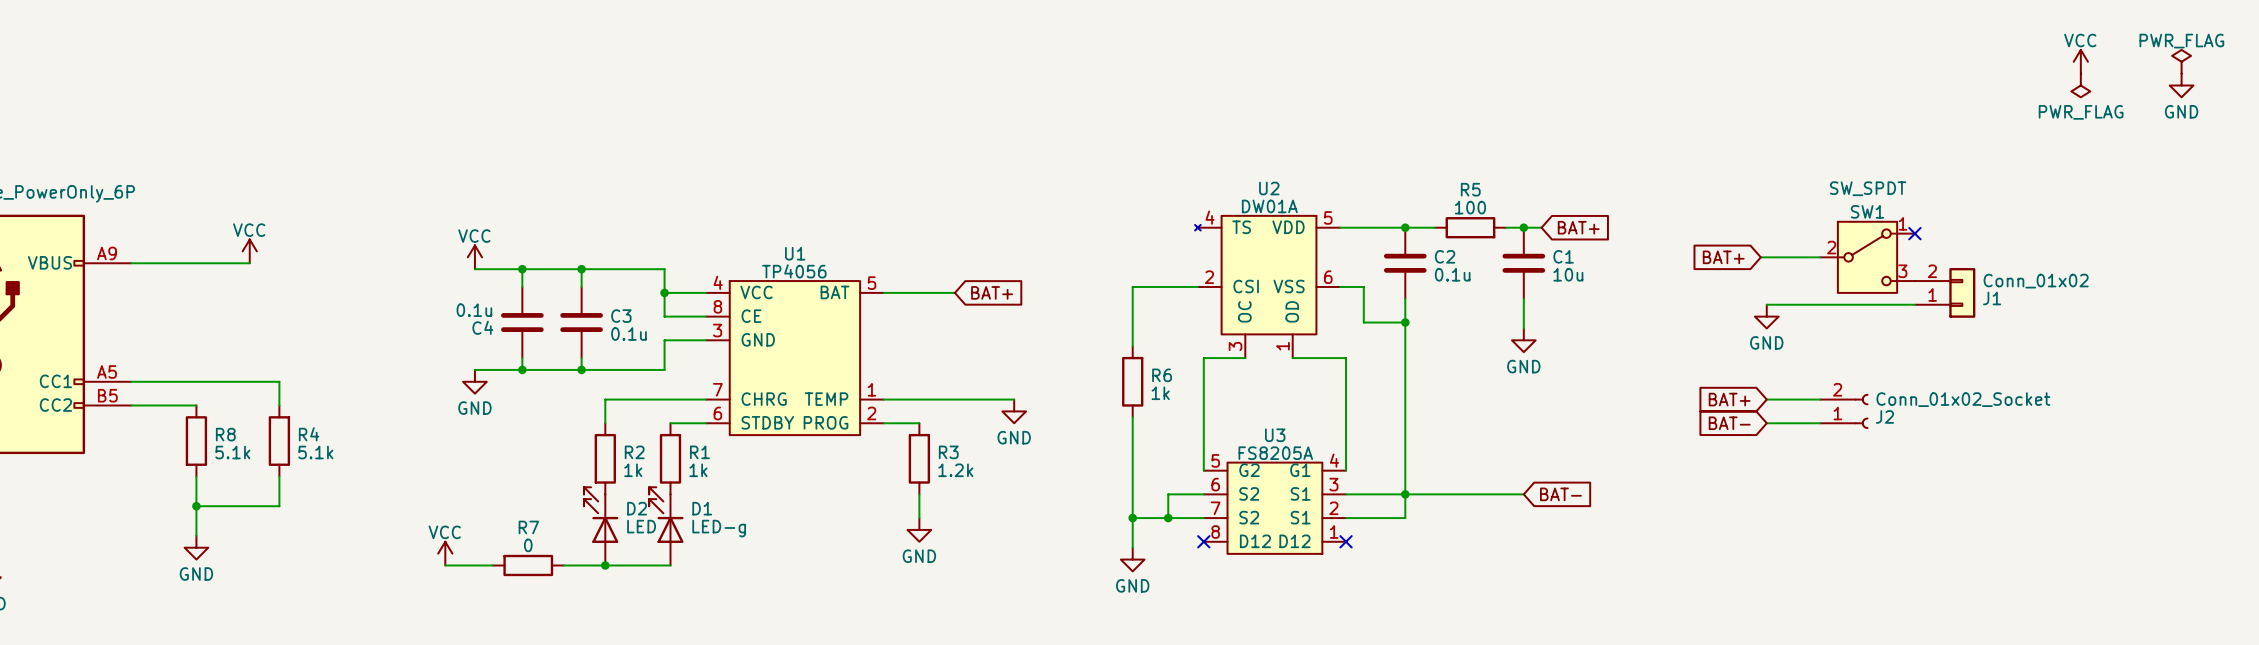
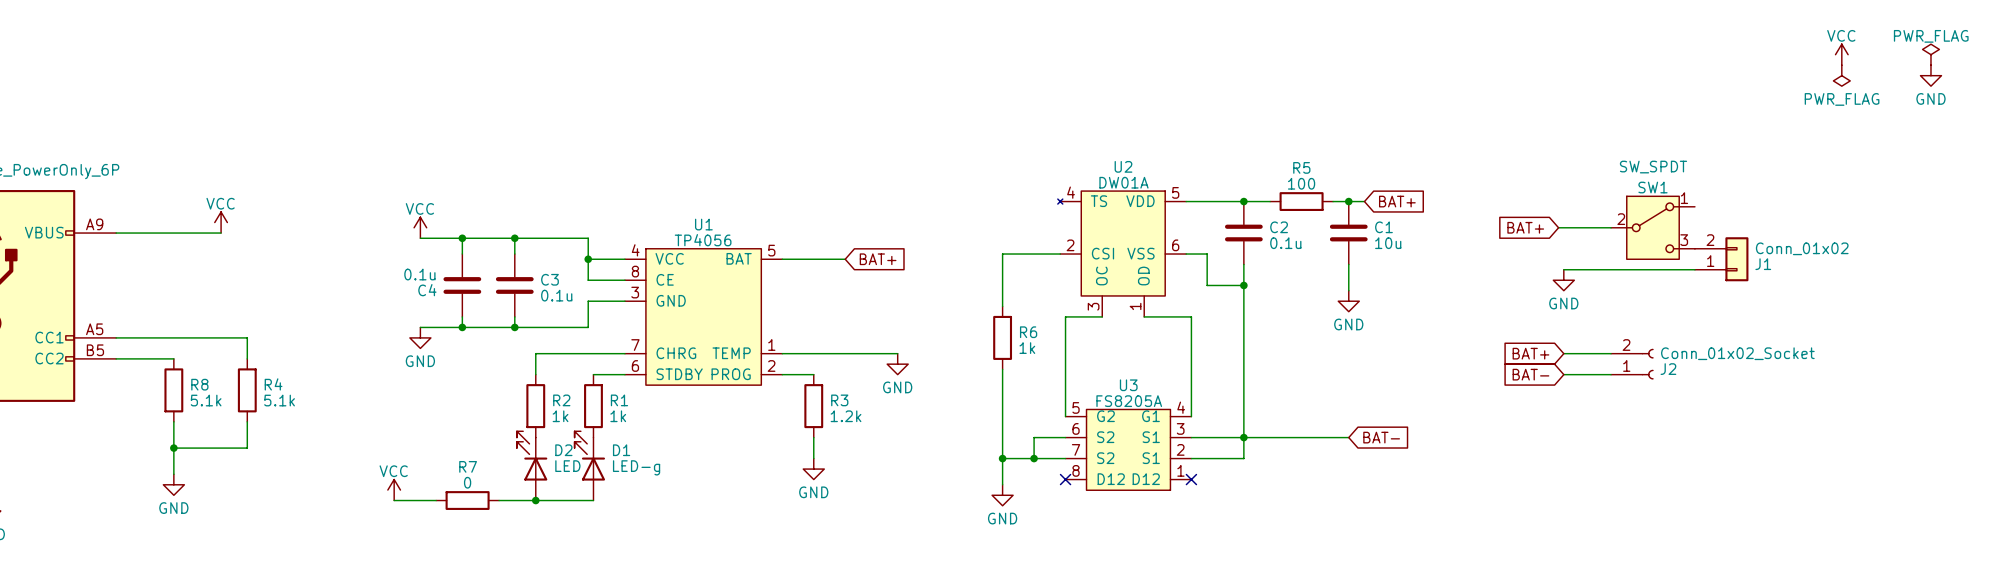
no-connect mark: (1914, 233) -> none

